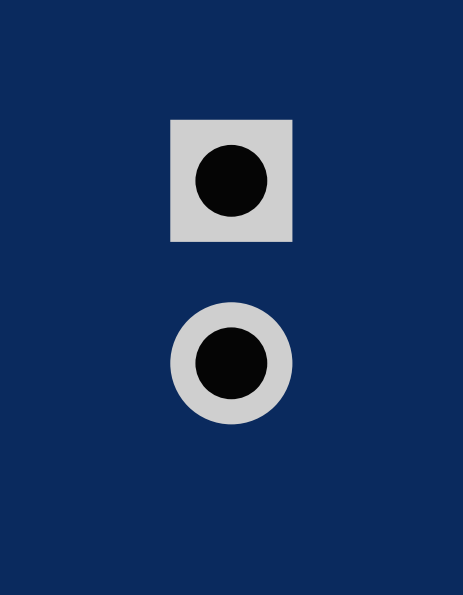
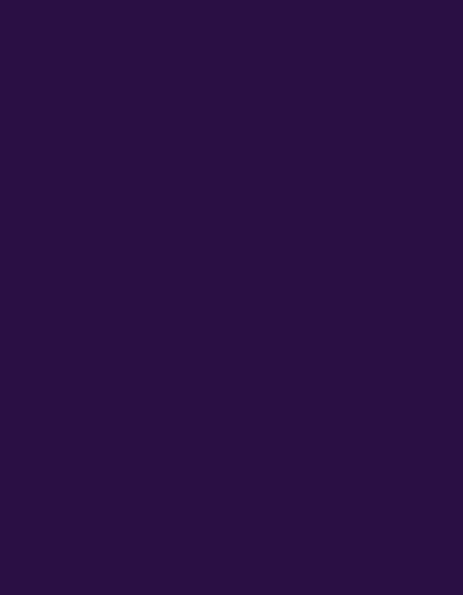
part: (231, 272) -> none

